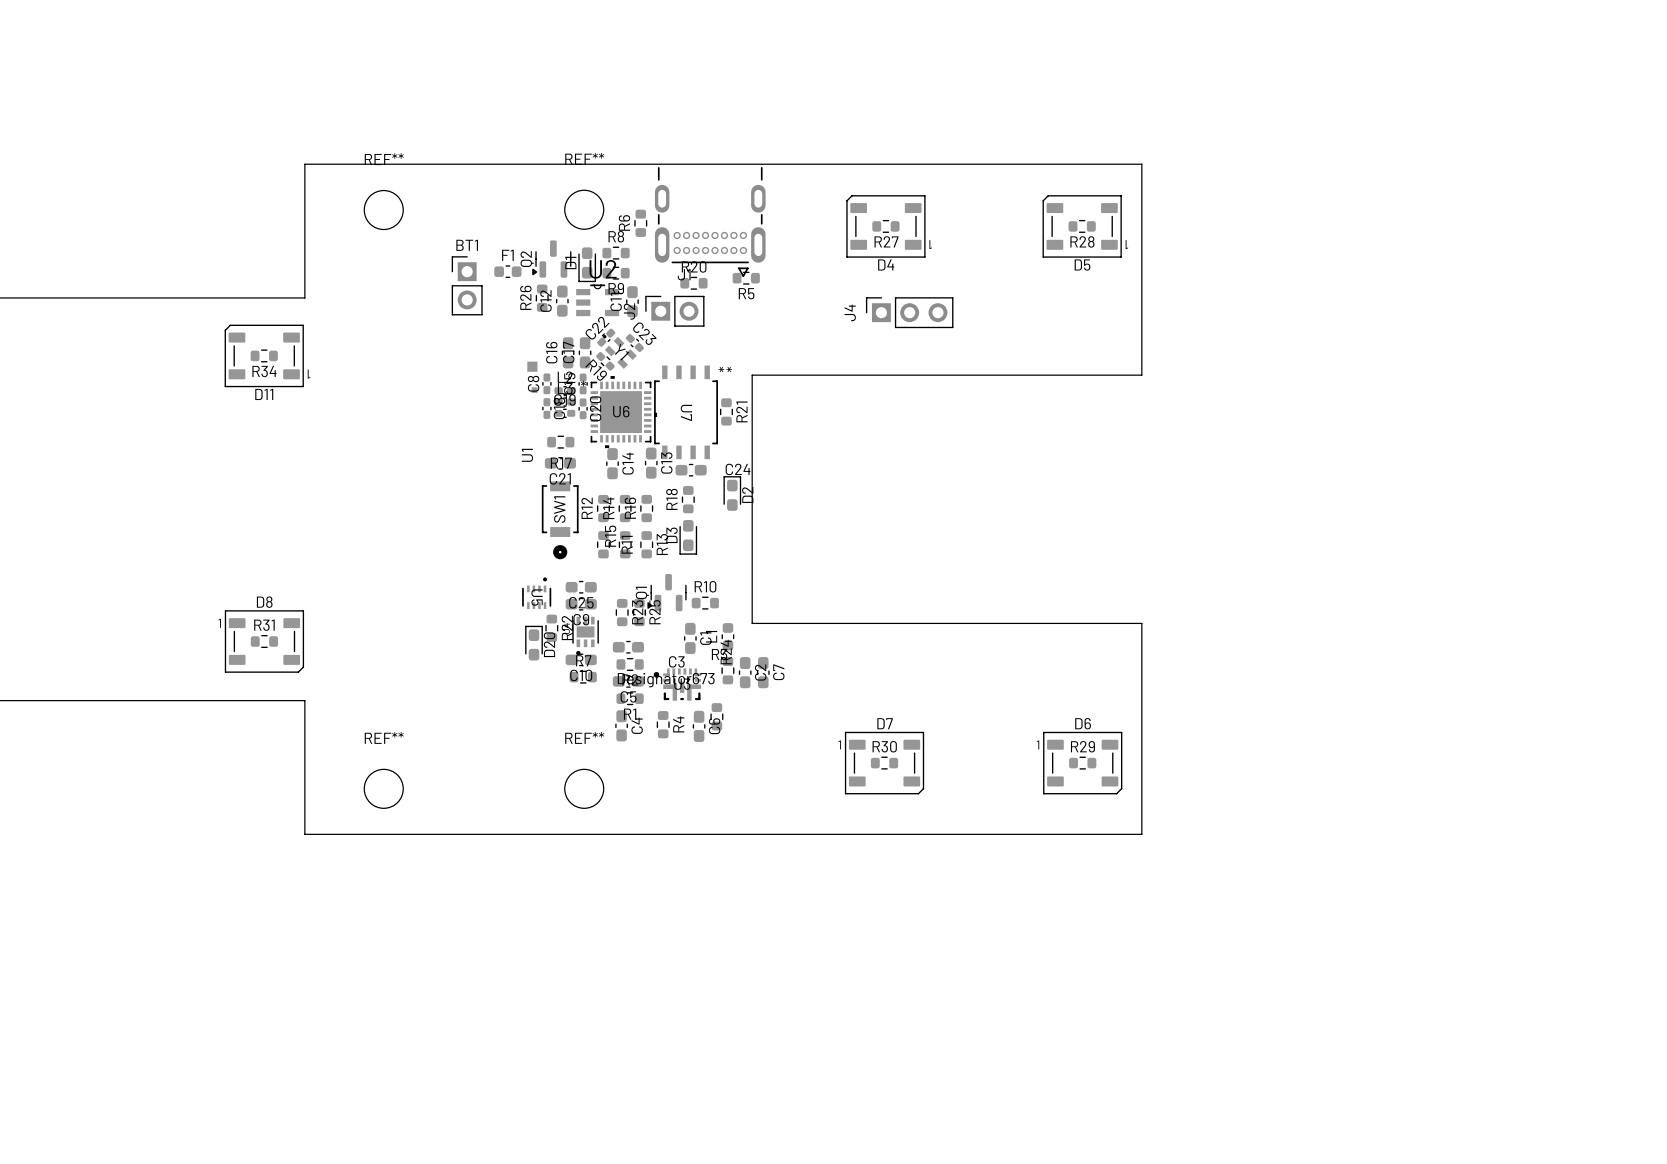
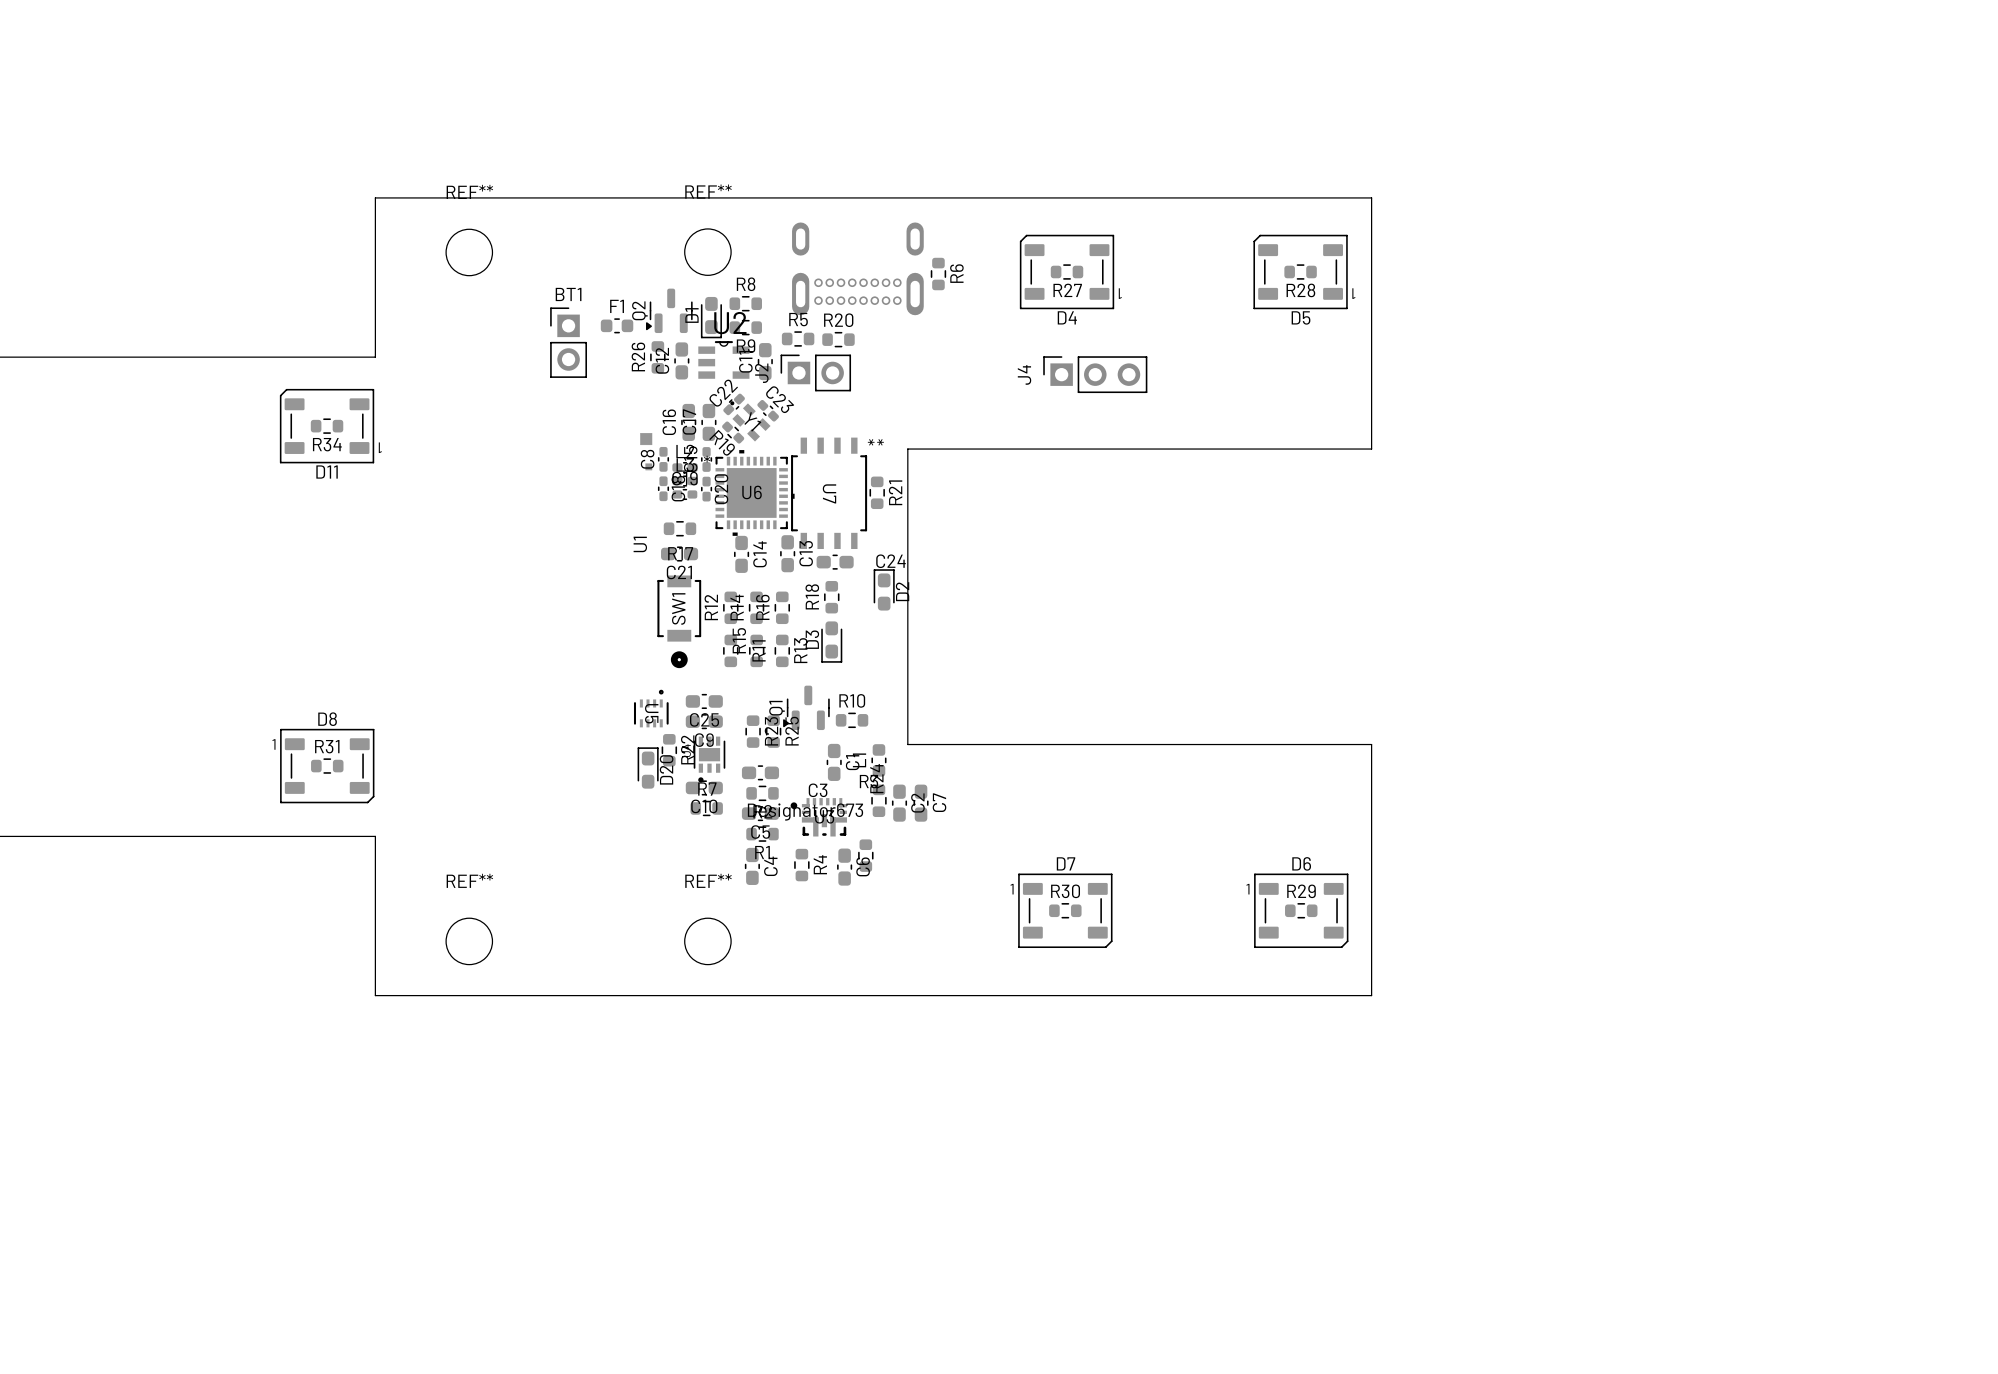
J1 side: top (710, 221) -> bottom (857, 268)
R6 name position: R6 (624, 222) -> R6 (956, 273)
R6 position: (640, 223) -> (938, 274)
R5 position: (746, 278) -> (798, 338)
R5 name position: R5 (746, 293) -> R5 (798, 319)

